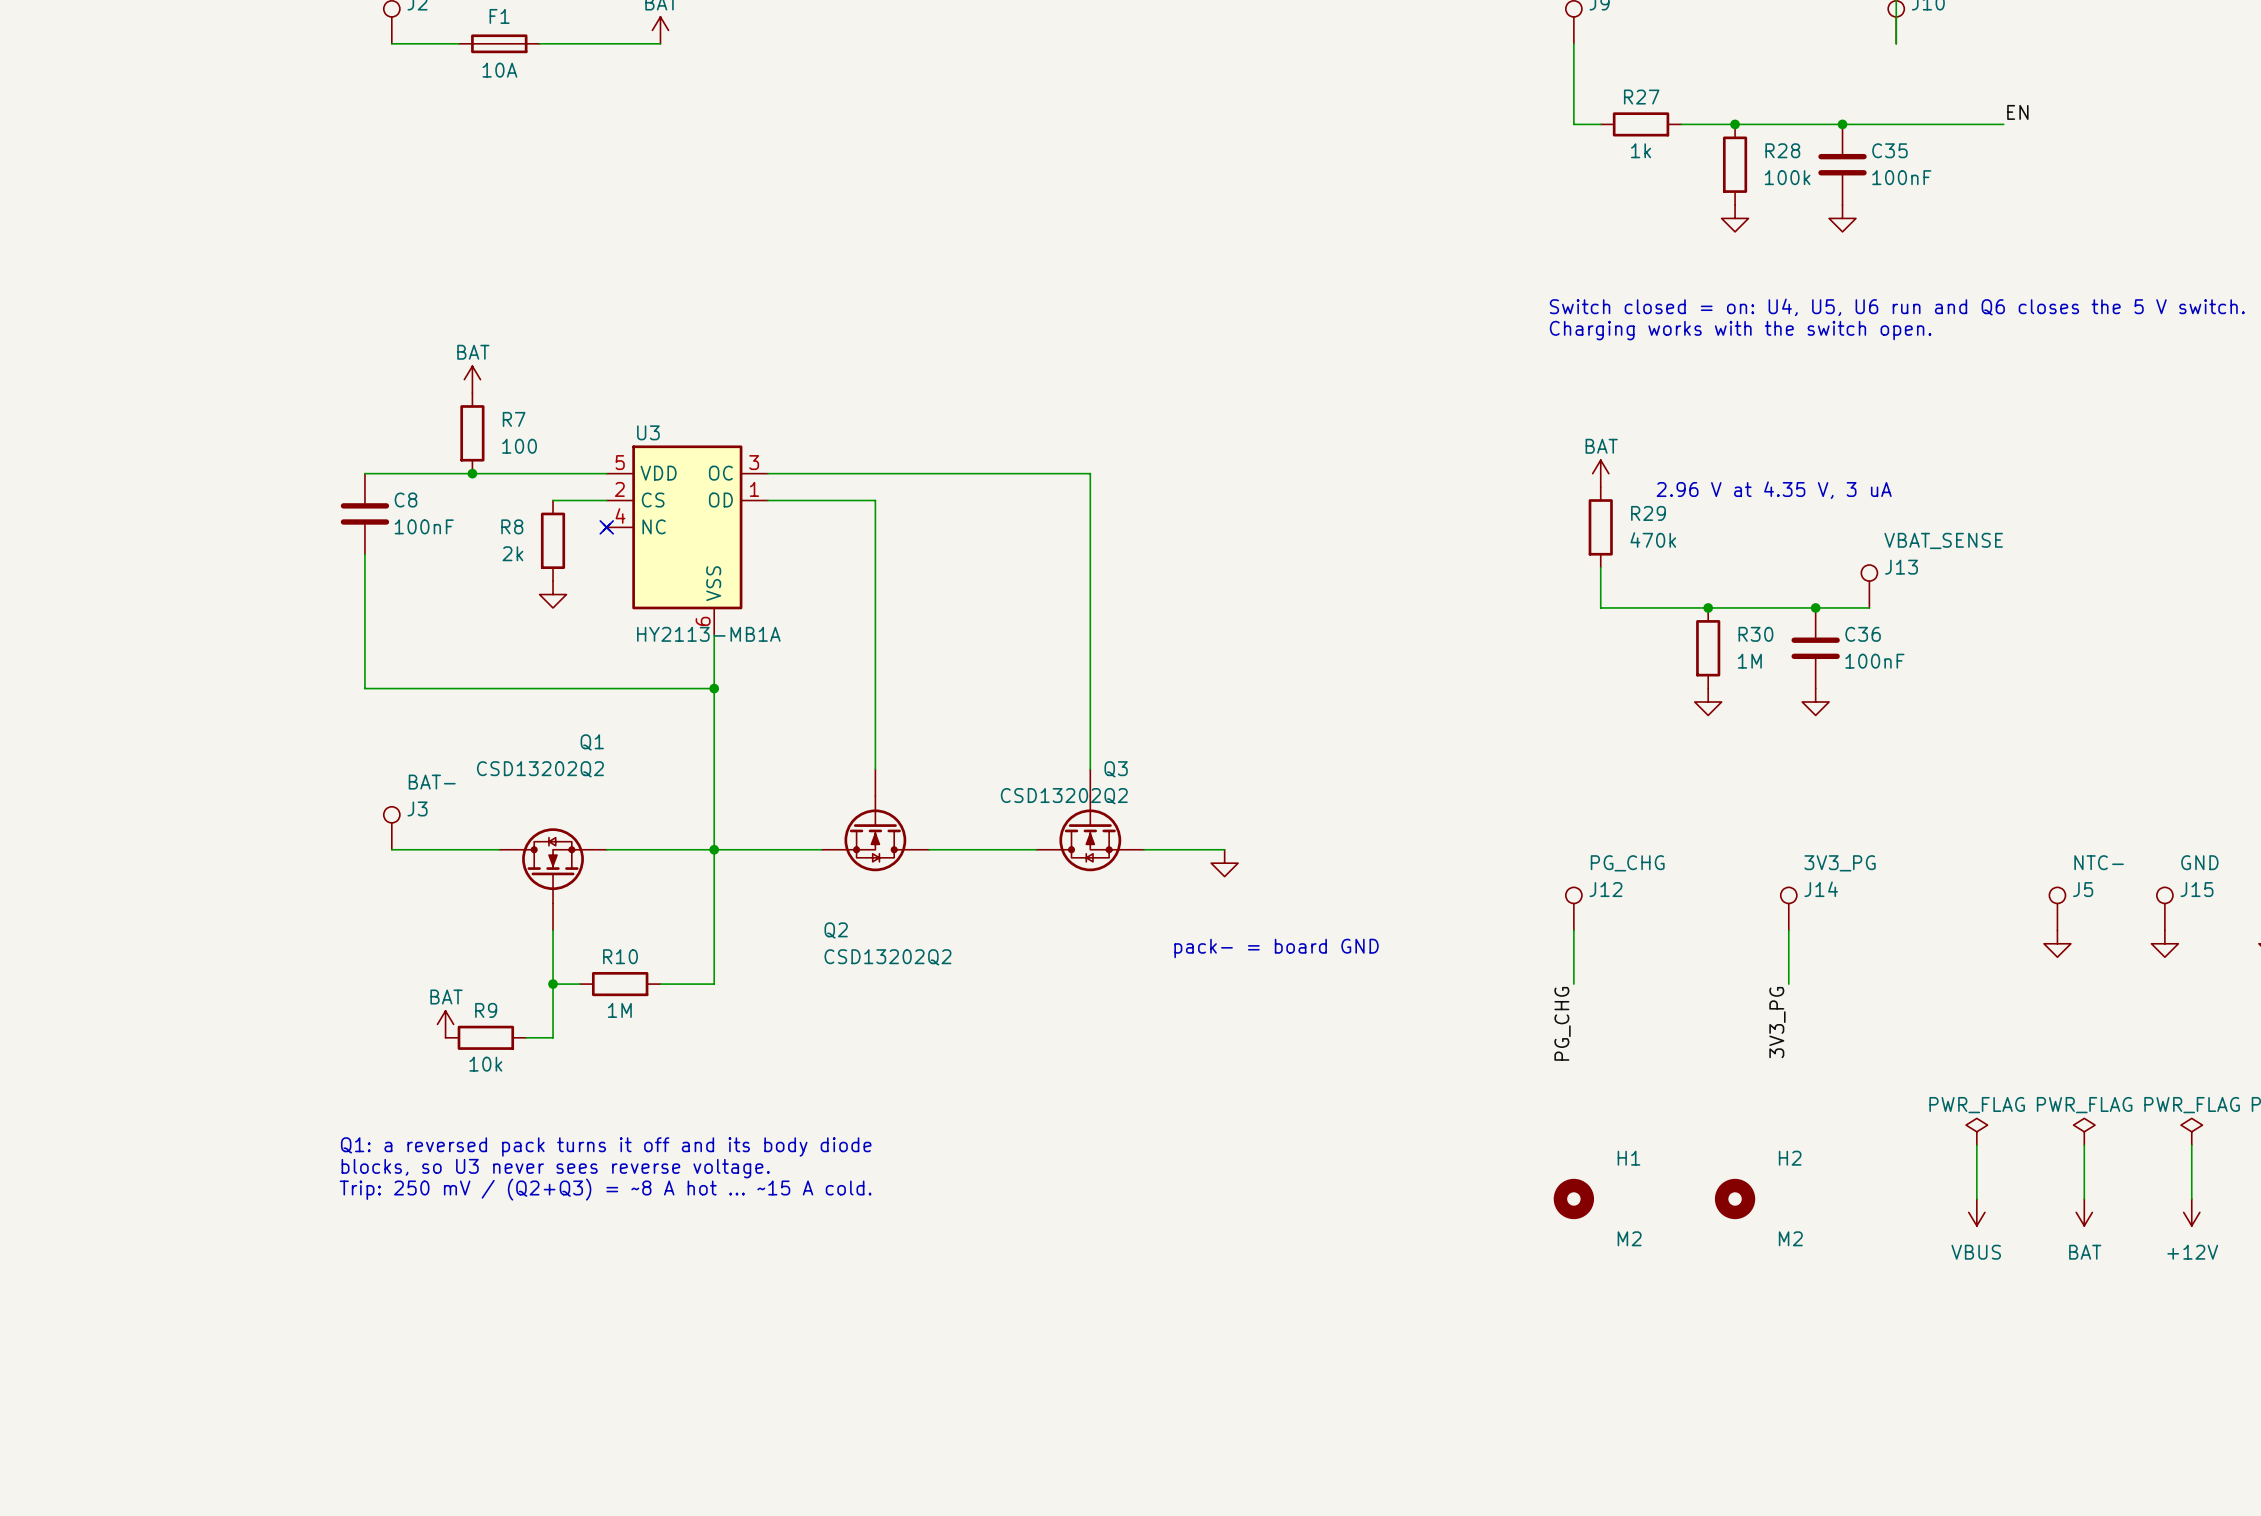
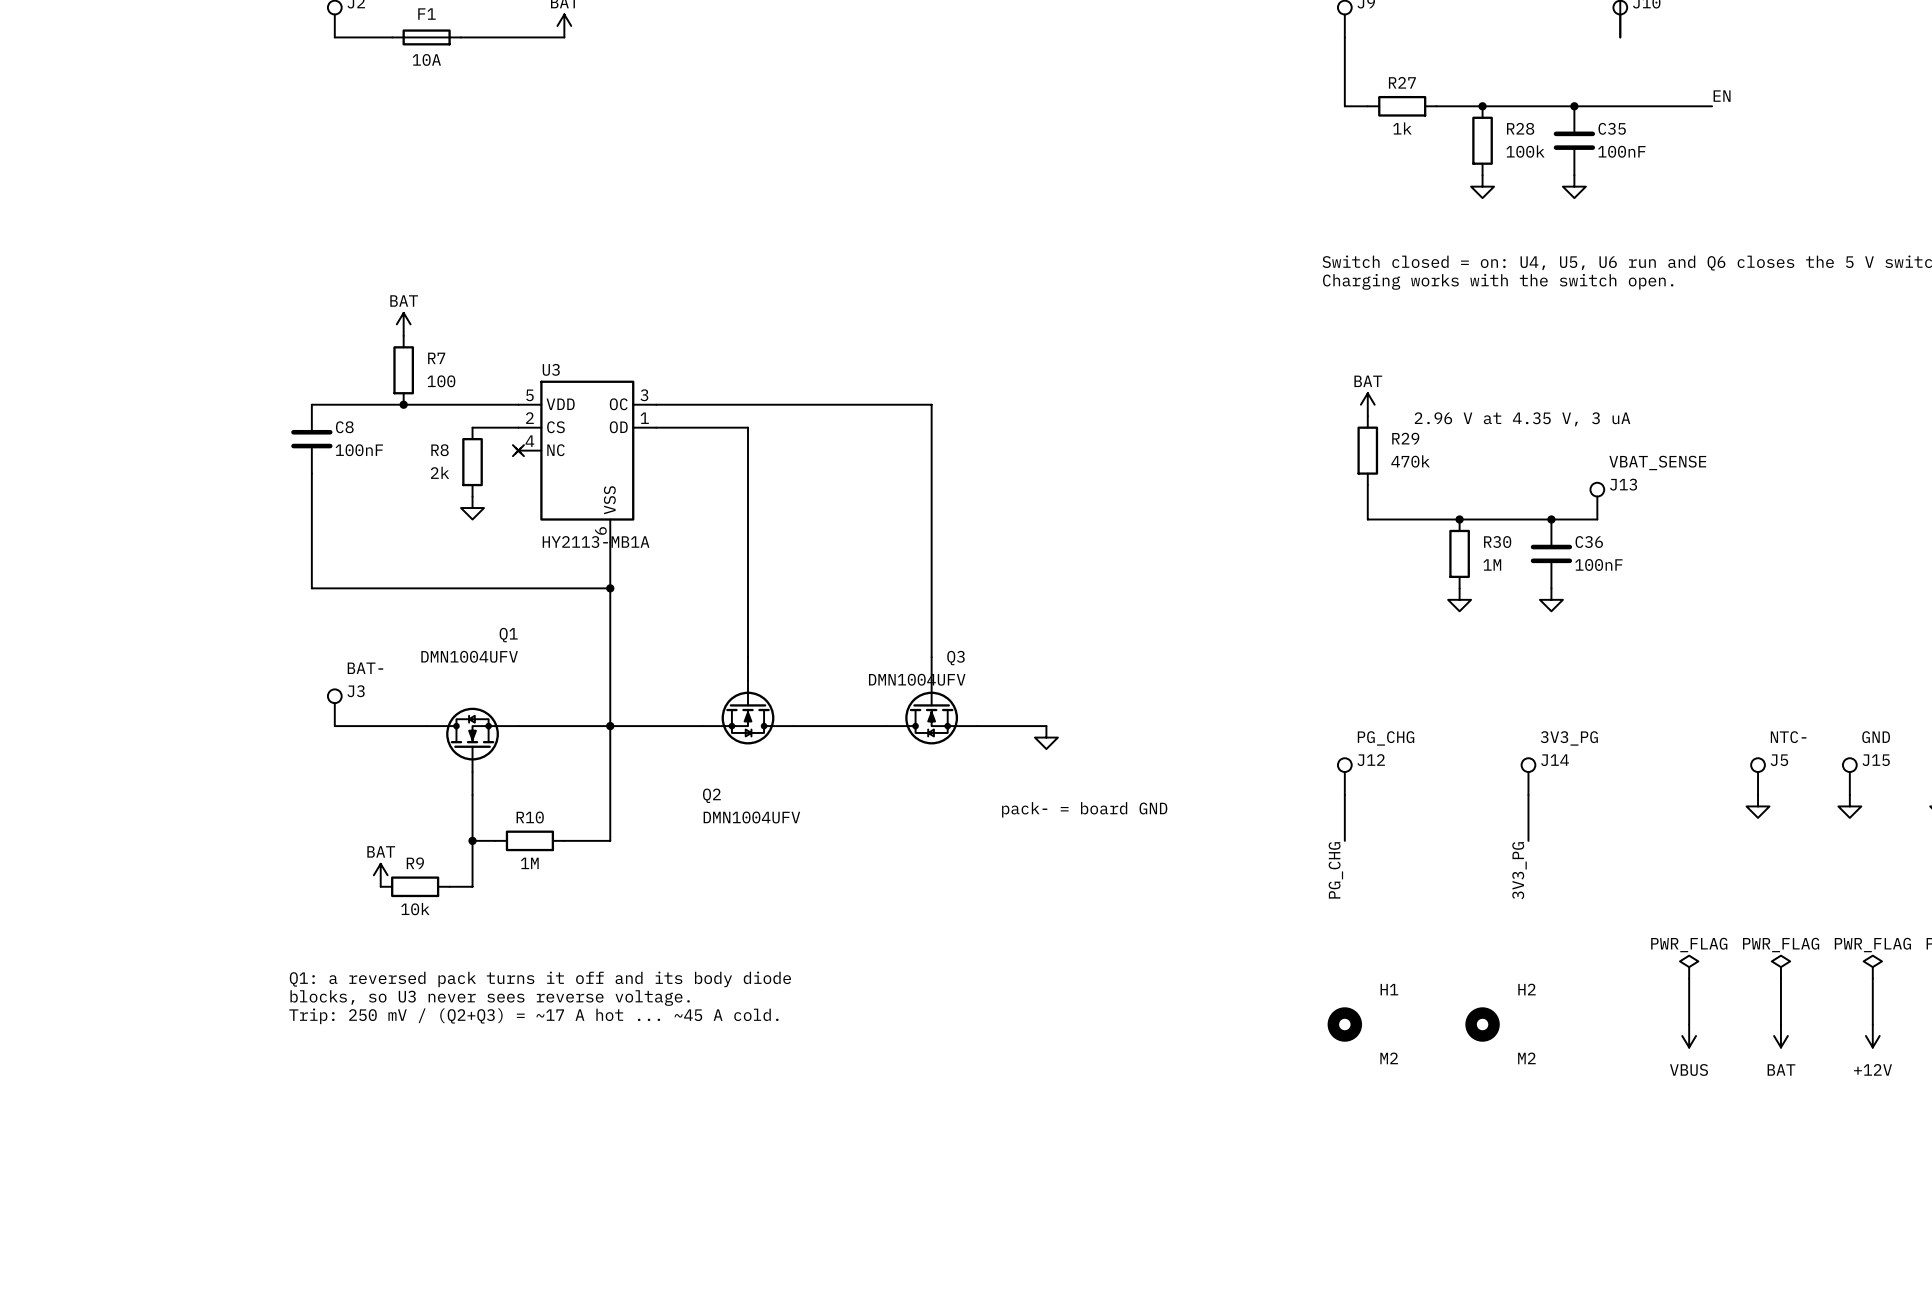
Q1 value: CSD13202Q2 (540, 769) -> DMN1004UFV (469, 656)
Q3 value: CSD13202Q2 (1064, 796) -> DMN1004UFV (917, 679)
Q2 value: CSD13202Q2 (887, 957) -> DMN1004UFV (751, 817)
text: Trip: 250 mV / (Q2+Q3) = ~8 A hot ... ~15 A cold. (605, 1189) -> Trip: 250 mV / (Q2+Q3) = ~17 A hot ... ~45 A cold. (533, 1016)

